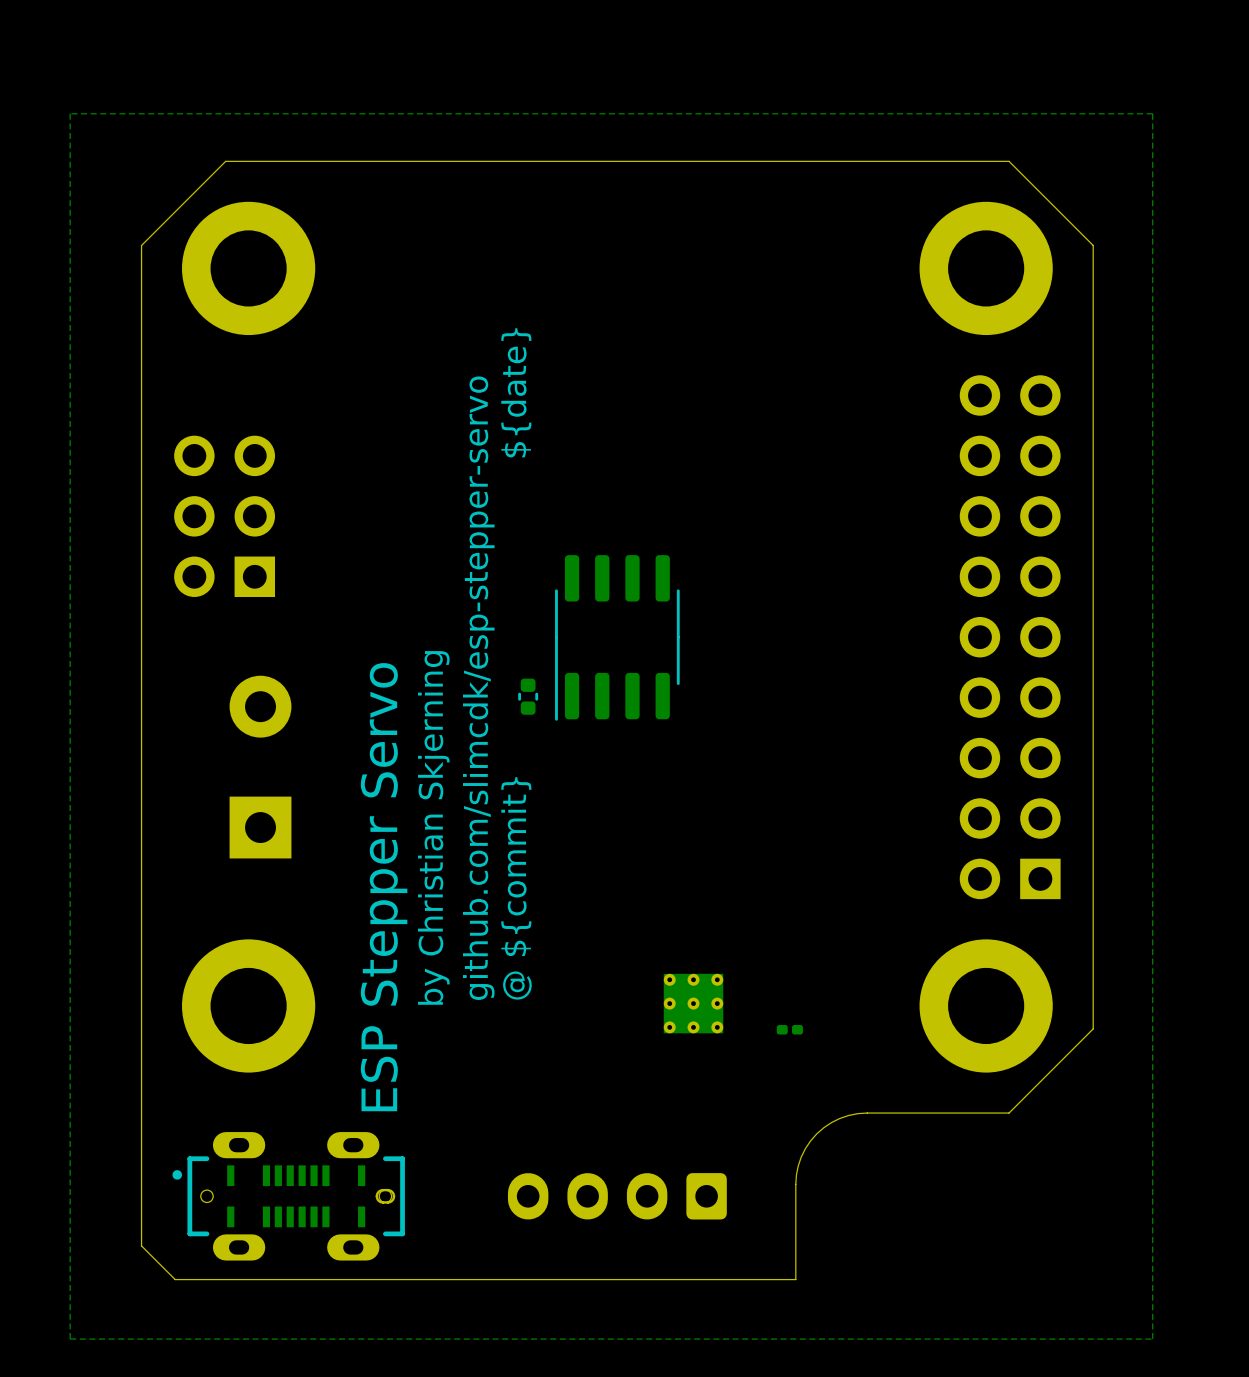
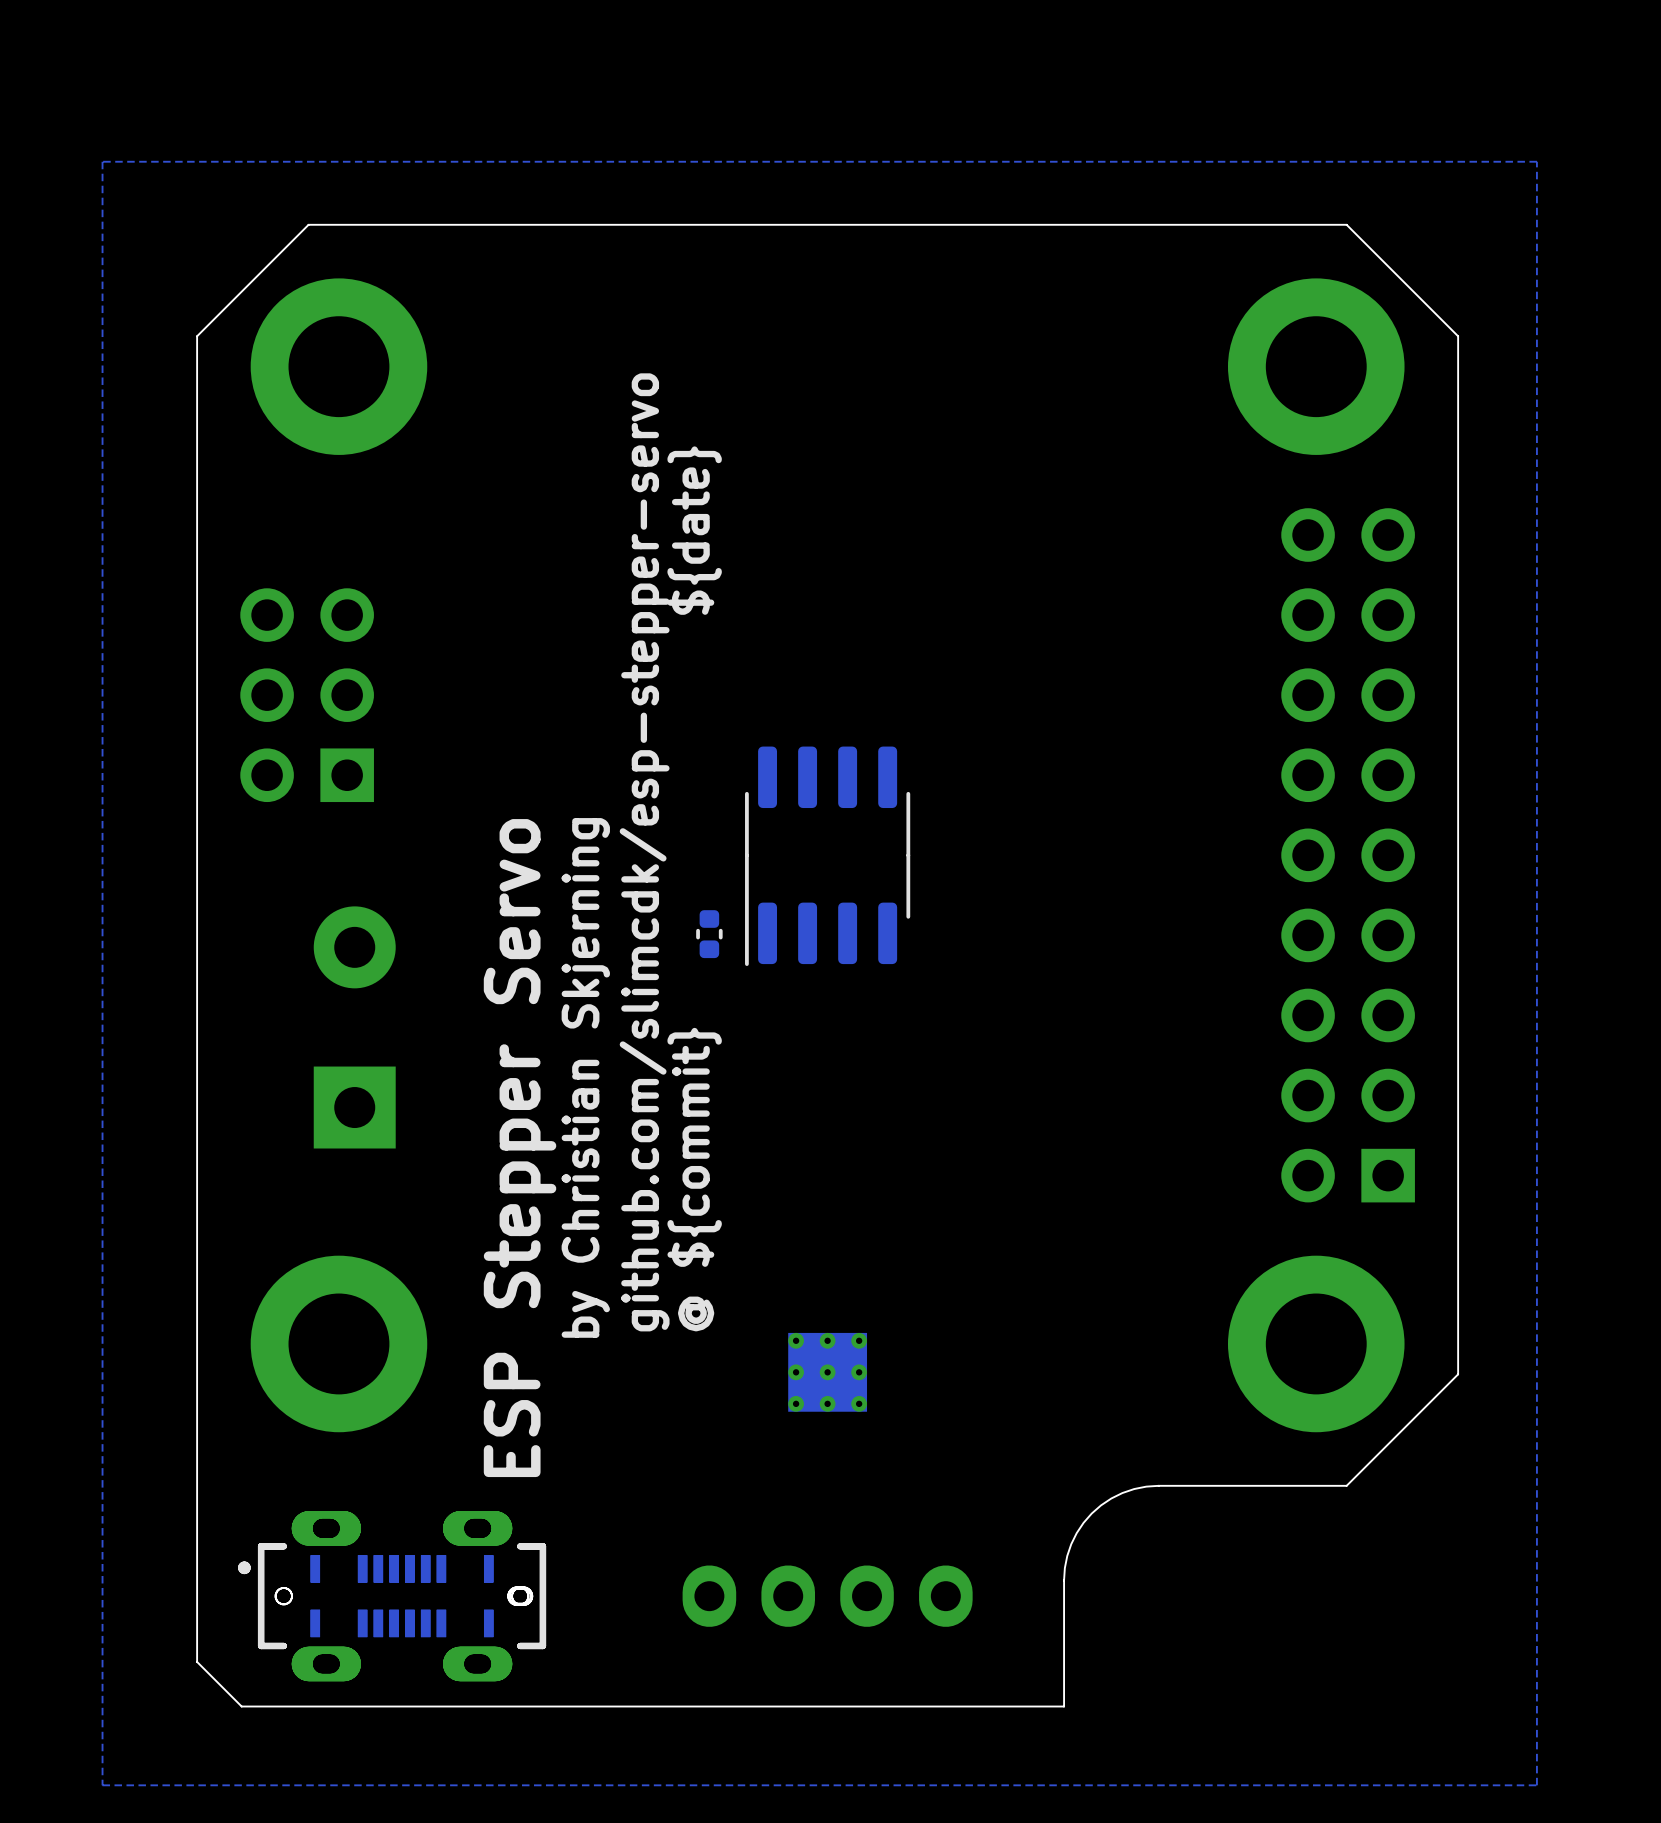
part position: (693, 1003) -> (827, 1372)
part: (789, 1029) -> none
part footprint: [507, 1173, 727, 1220] -> [682, 1565, 973, 1627]
part: none -> (392, 1596)

